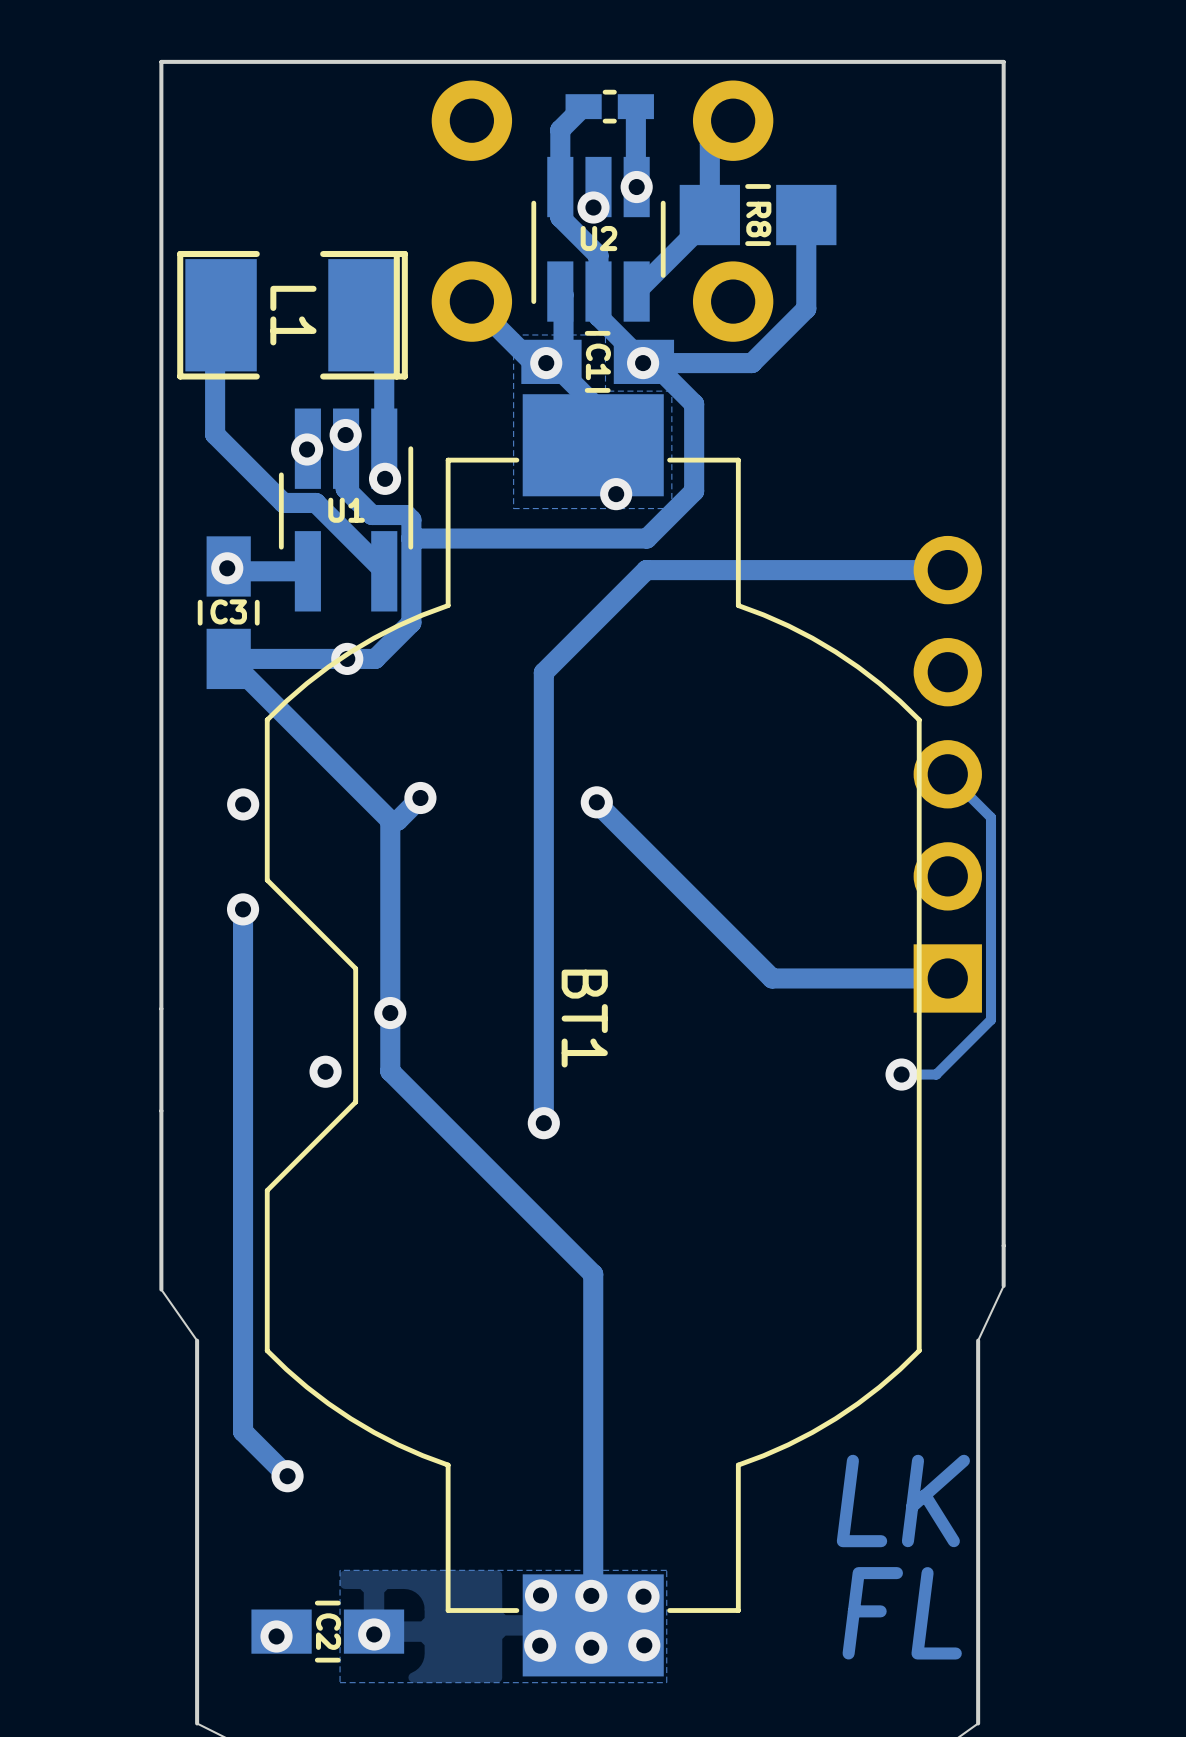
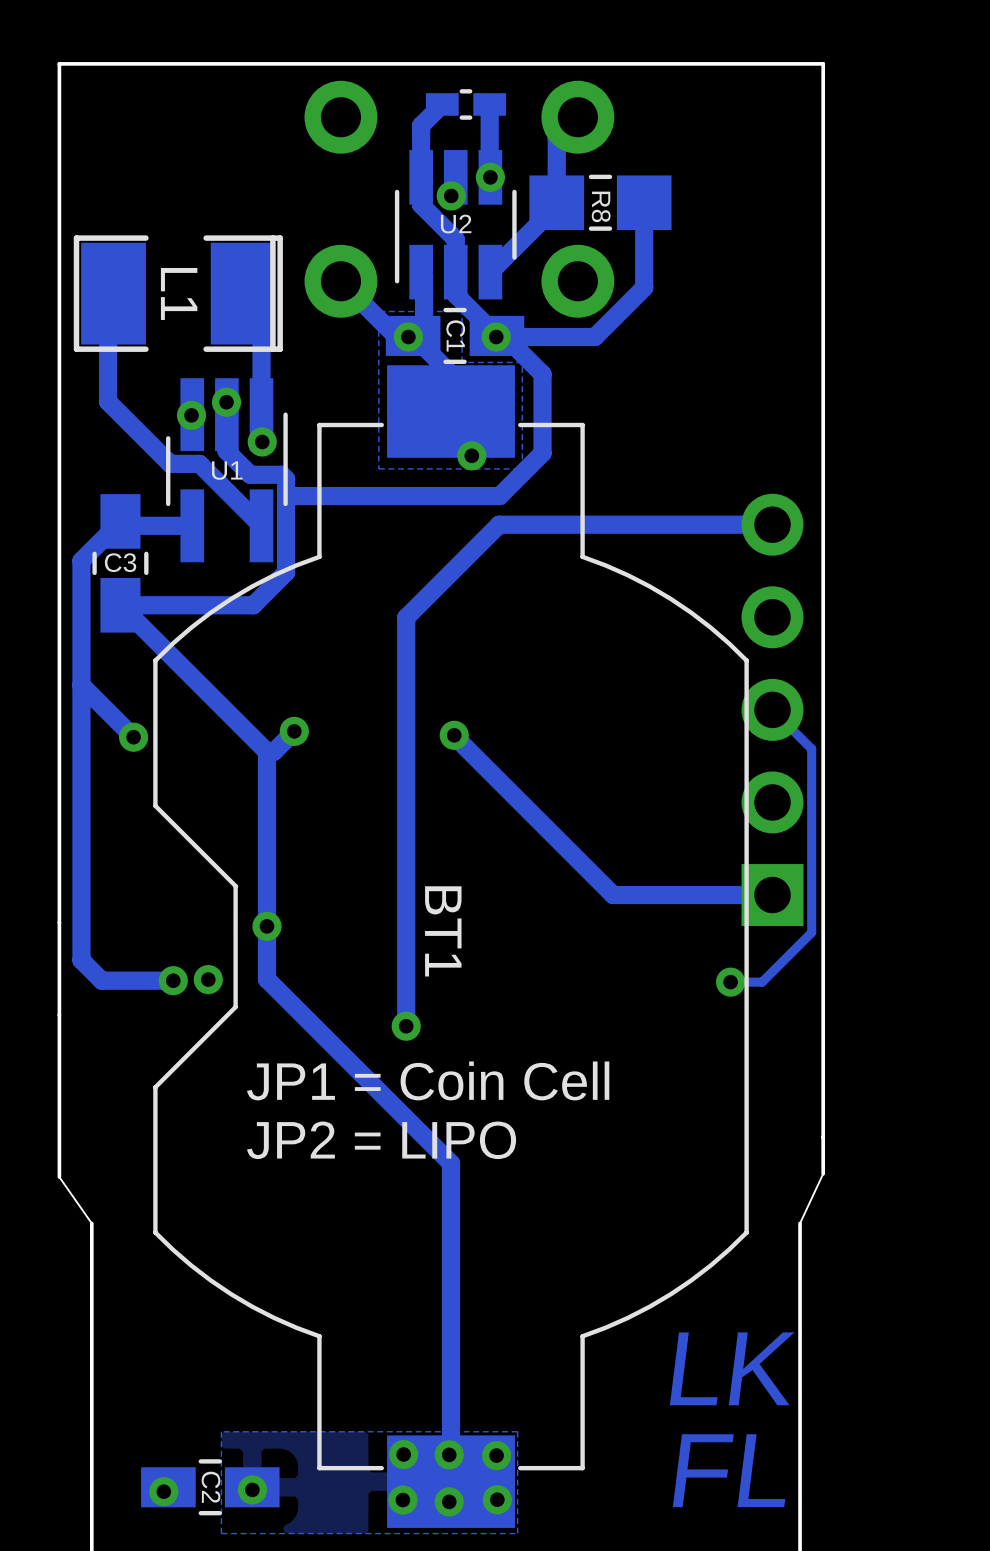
track: none -> (119, 523) (81, 560) (81, 960) (101, 980) (173, 980)
via: (227, 568) -> none
via: (347, 658) -> none
track: none -> (81, 685) (133, 737)
track: (243, 909) (243, 1431) (287, 1476) -> none
via position: (243, 909) -> (173, 980)
text: none -> JP1 = Coin Cell (428, 1080)
text: none -> JP2 = LIPO (381, 1140)
via: (287, 1476) -> none

